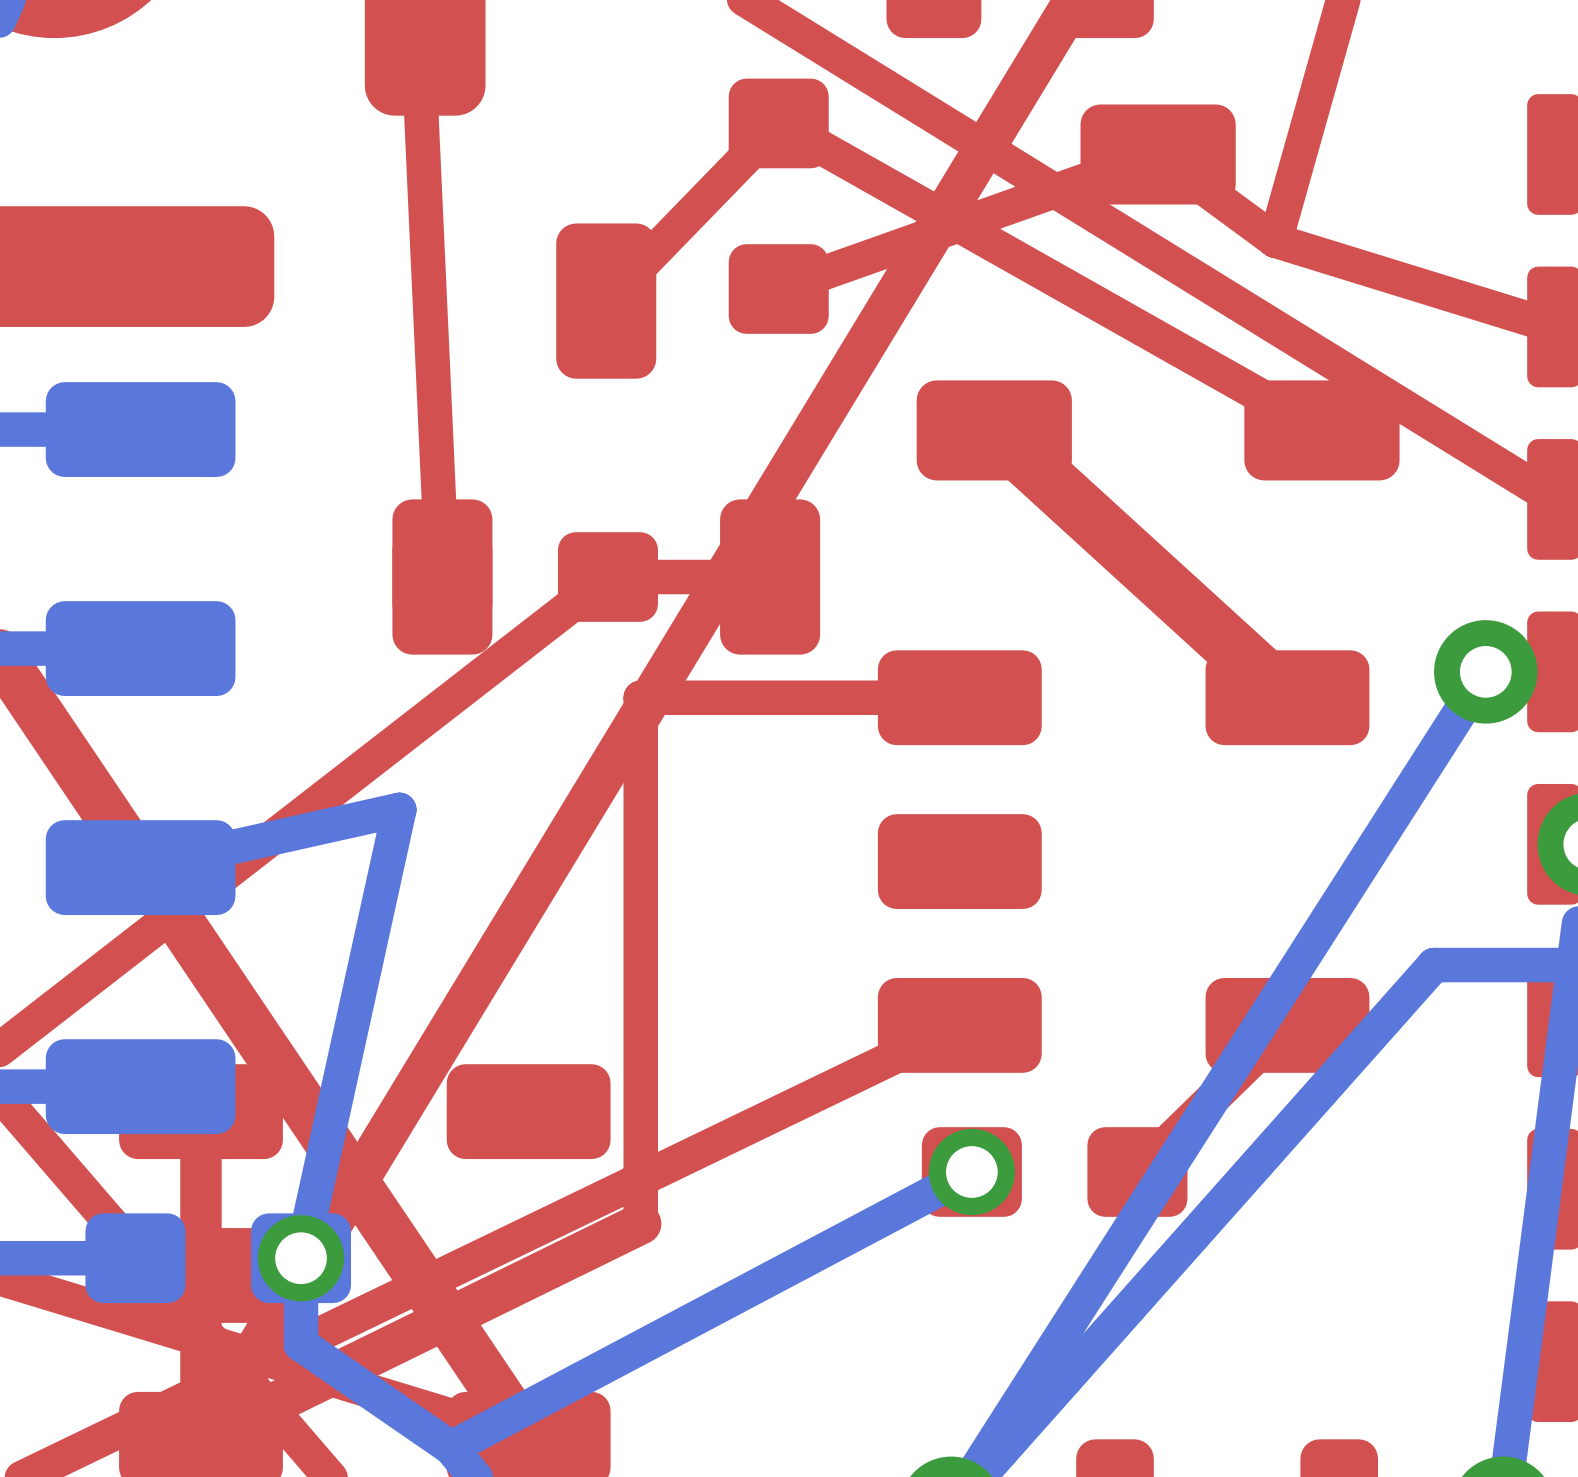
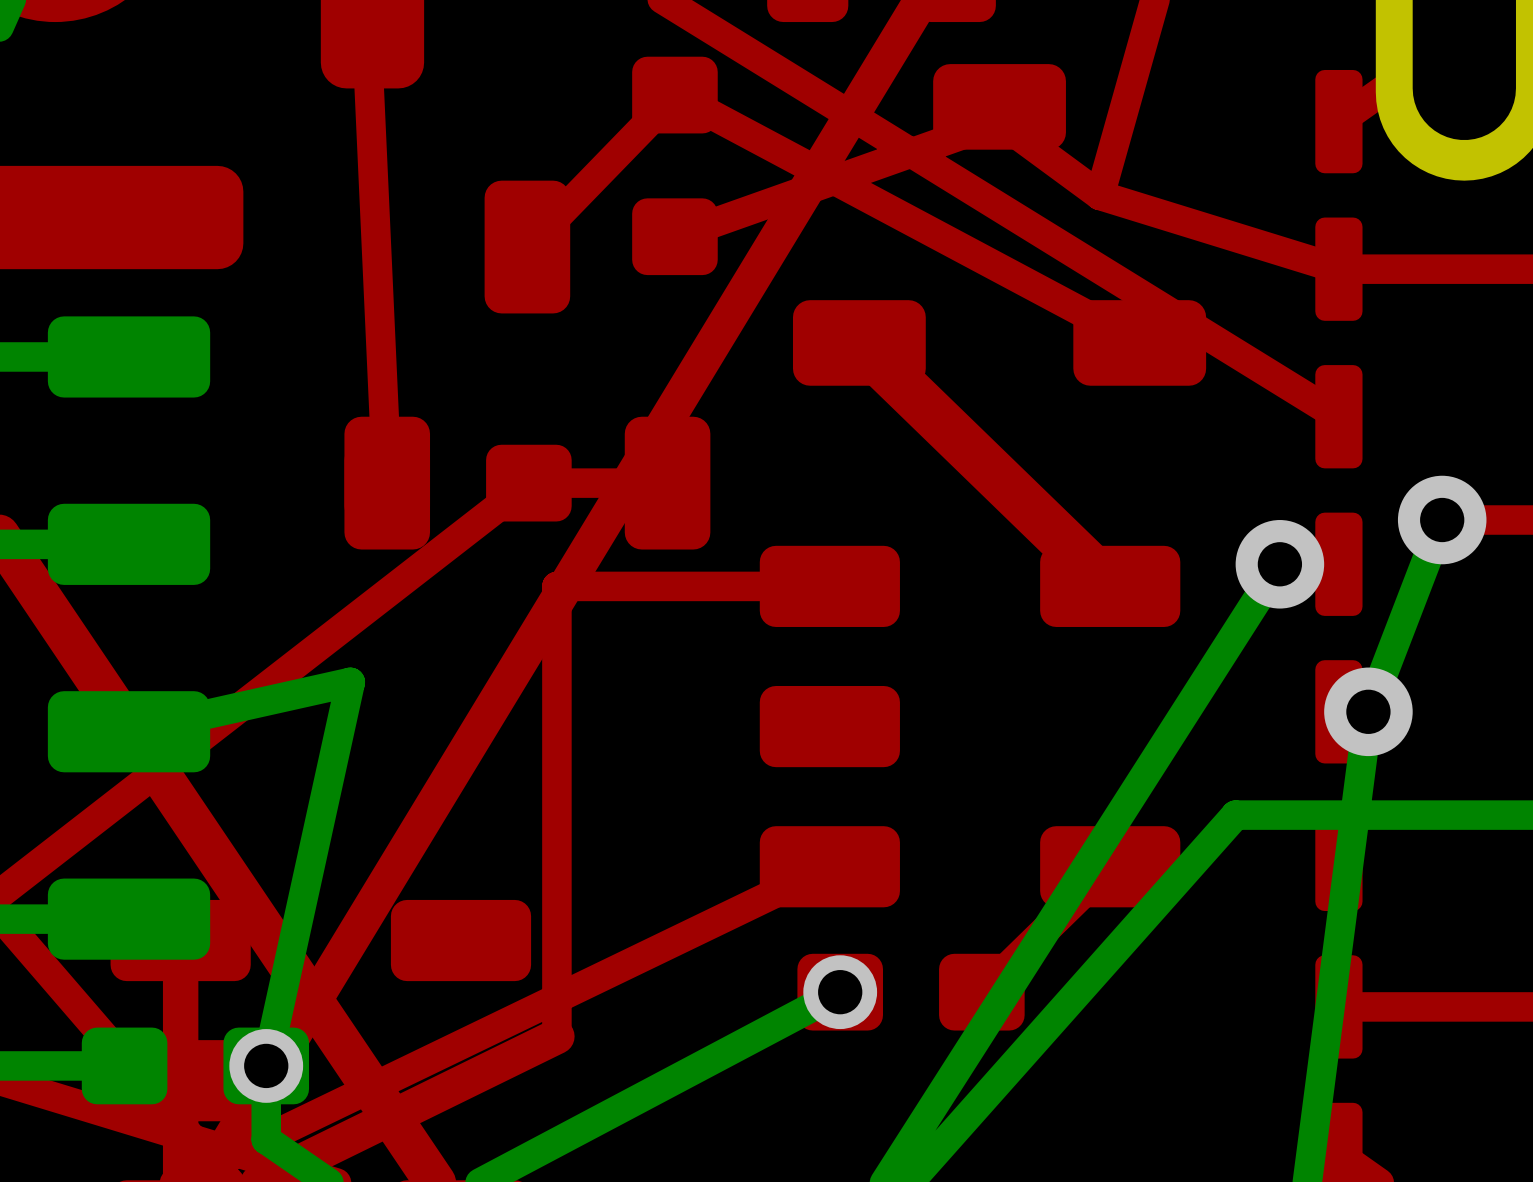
top track: (778, 123) (1321, 430) -> (674, 95) (1139, 342)
part position: (1158, 292) -> (999, 224)
top track: (994, 430) (1287, 697) -> (859, 342) (1110, 586)

